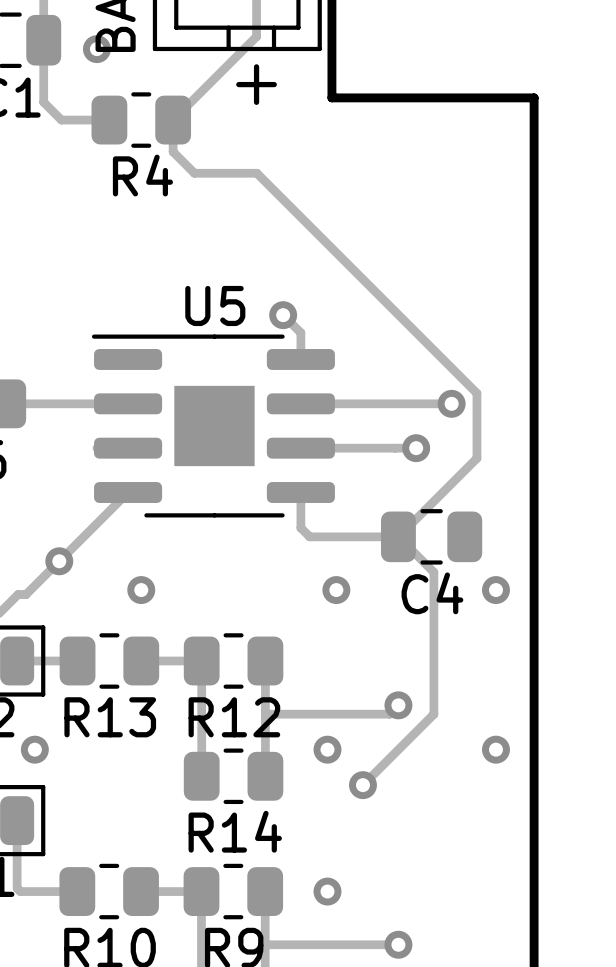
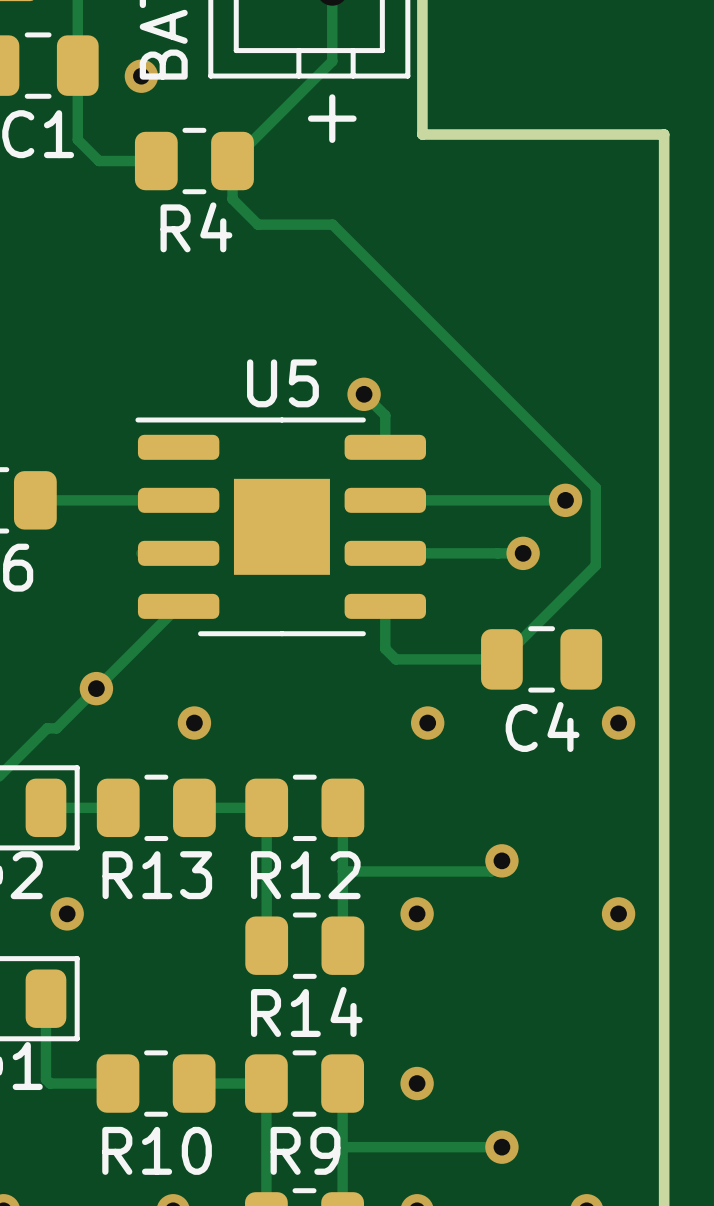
track: (398, 536) (433, 572) (433, 714) (362, 785) -> none
via: (362, 785) -> none

